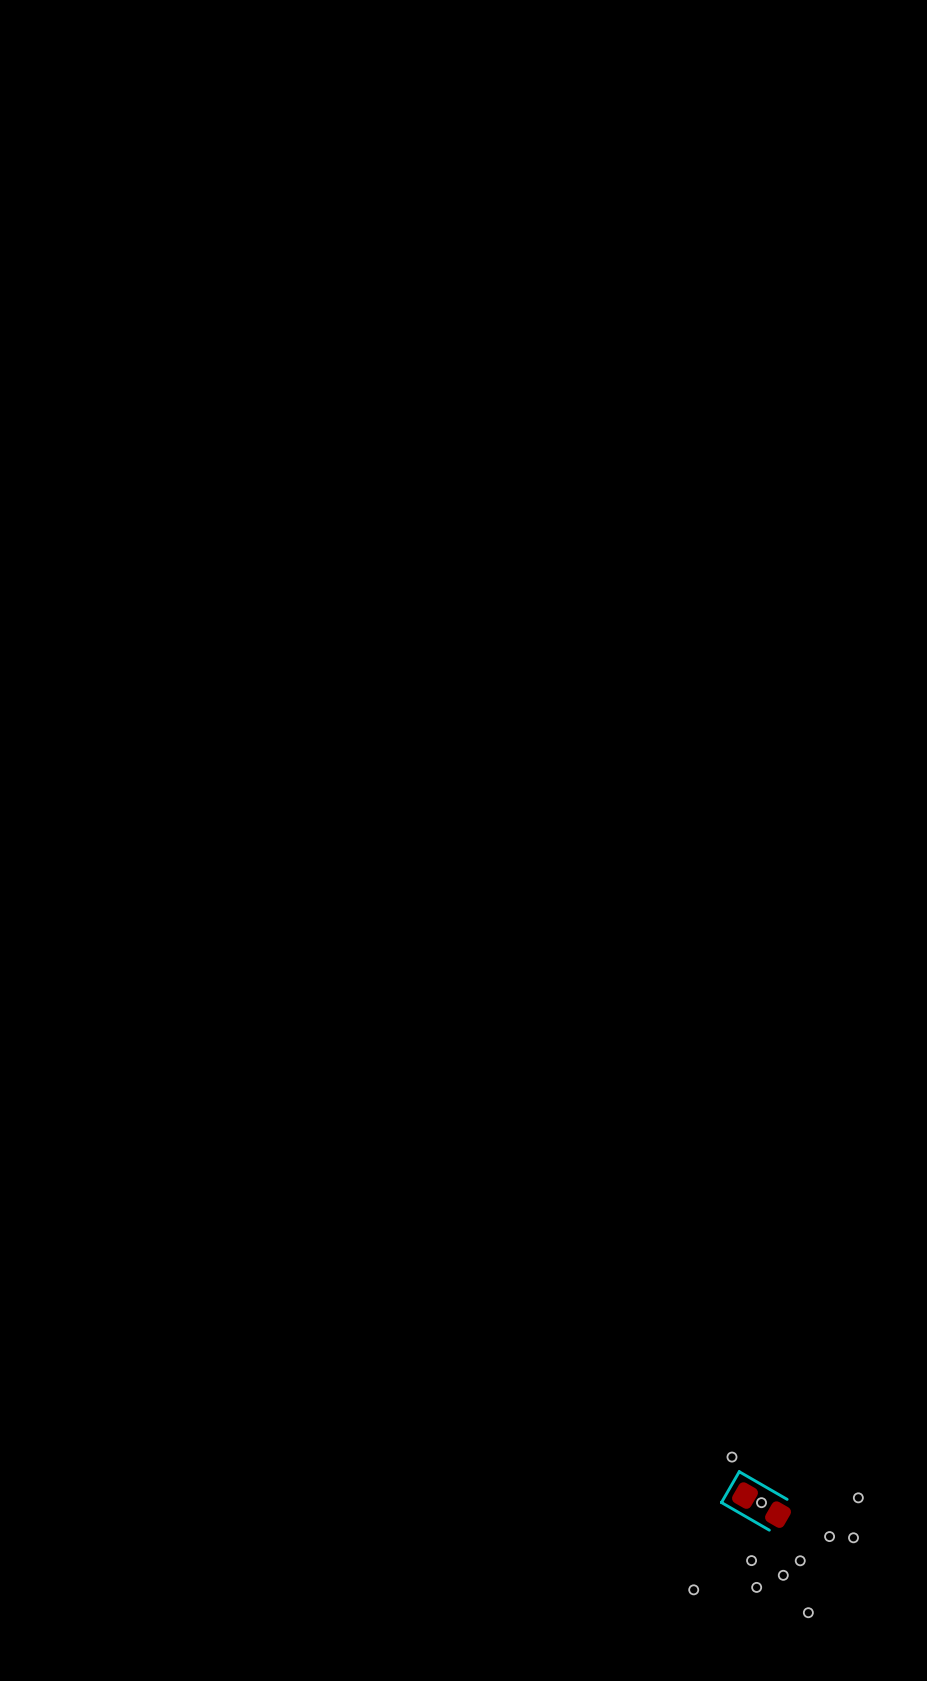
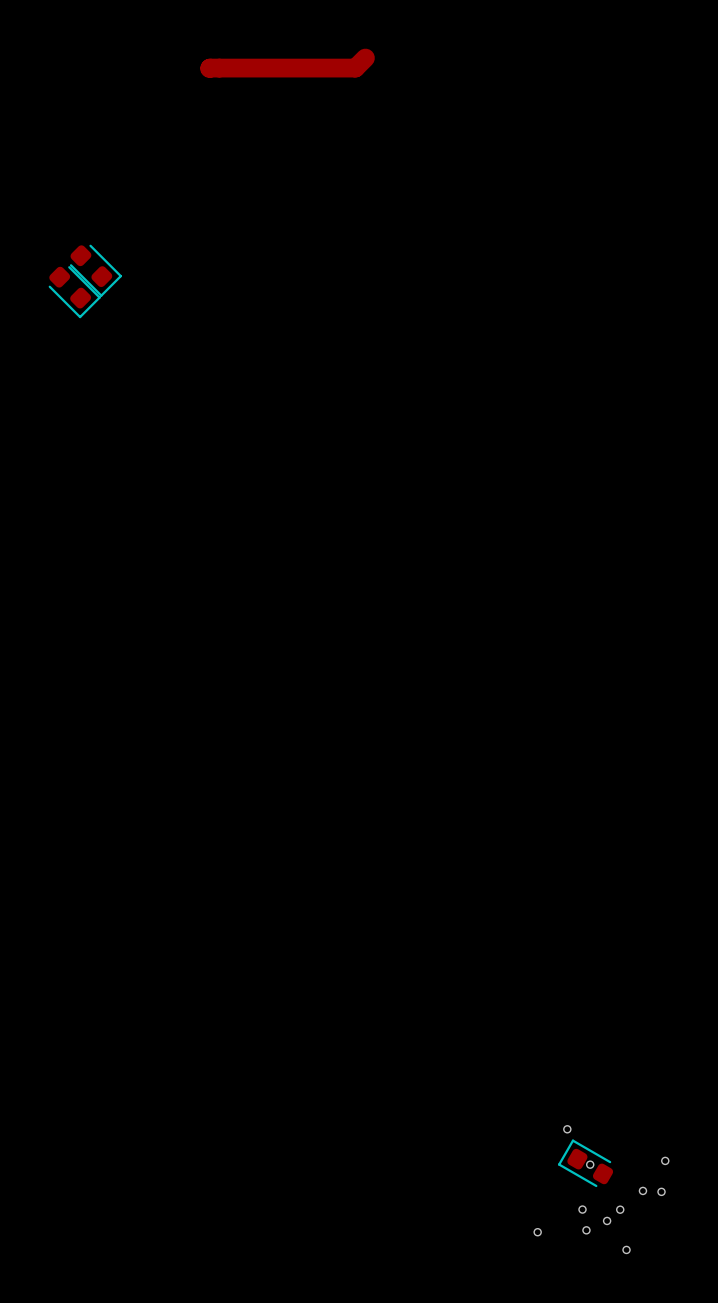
track: none -> (365, 58) (355, 68) (209, 68)
part: none -> (95, 270)
part: none -> (74, 292)

